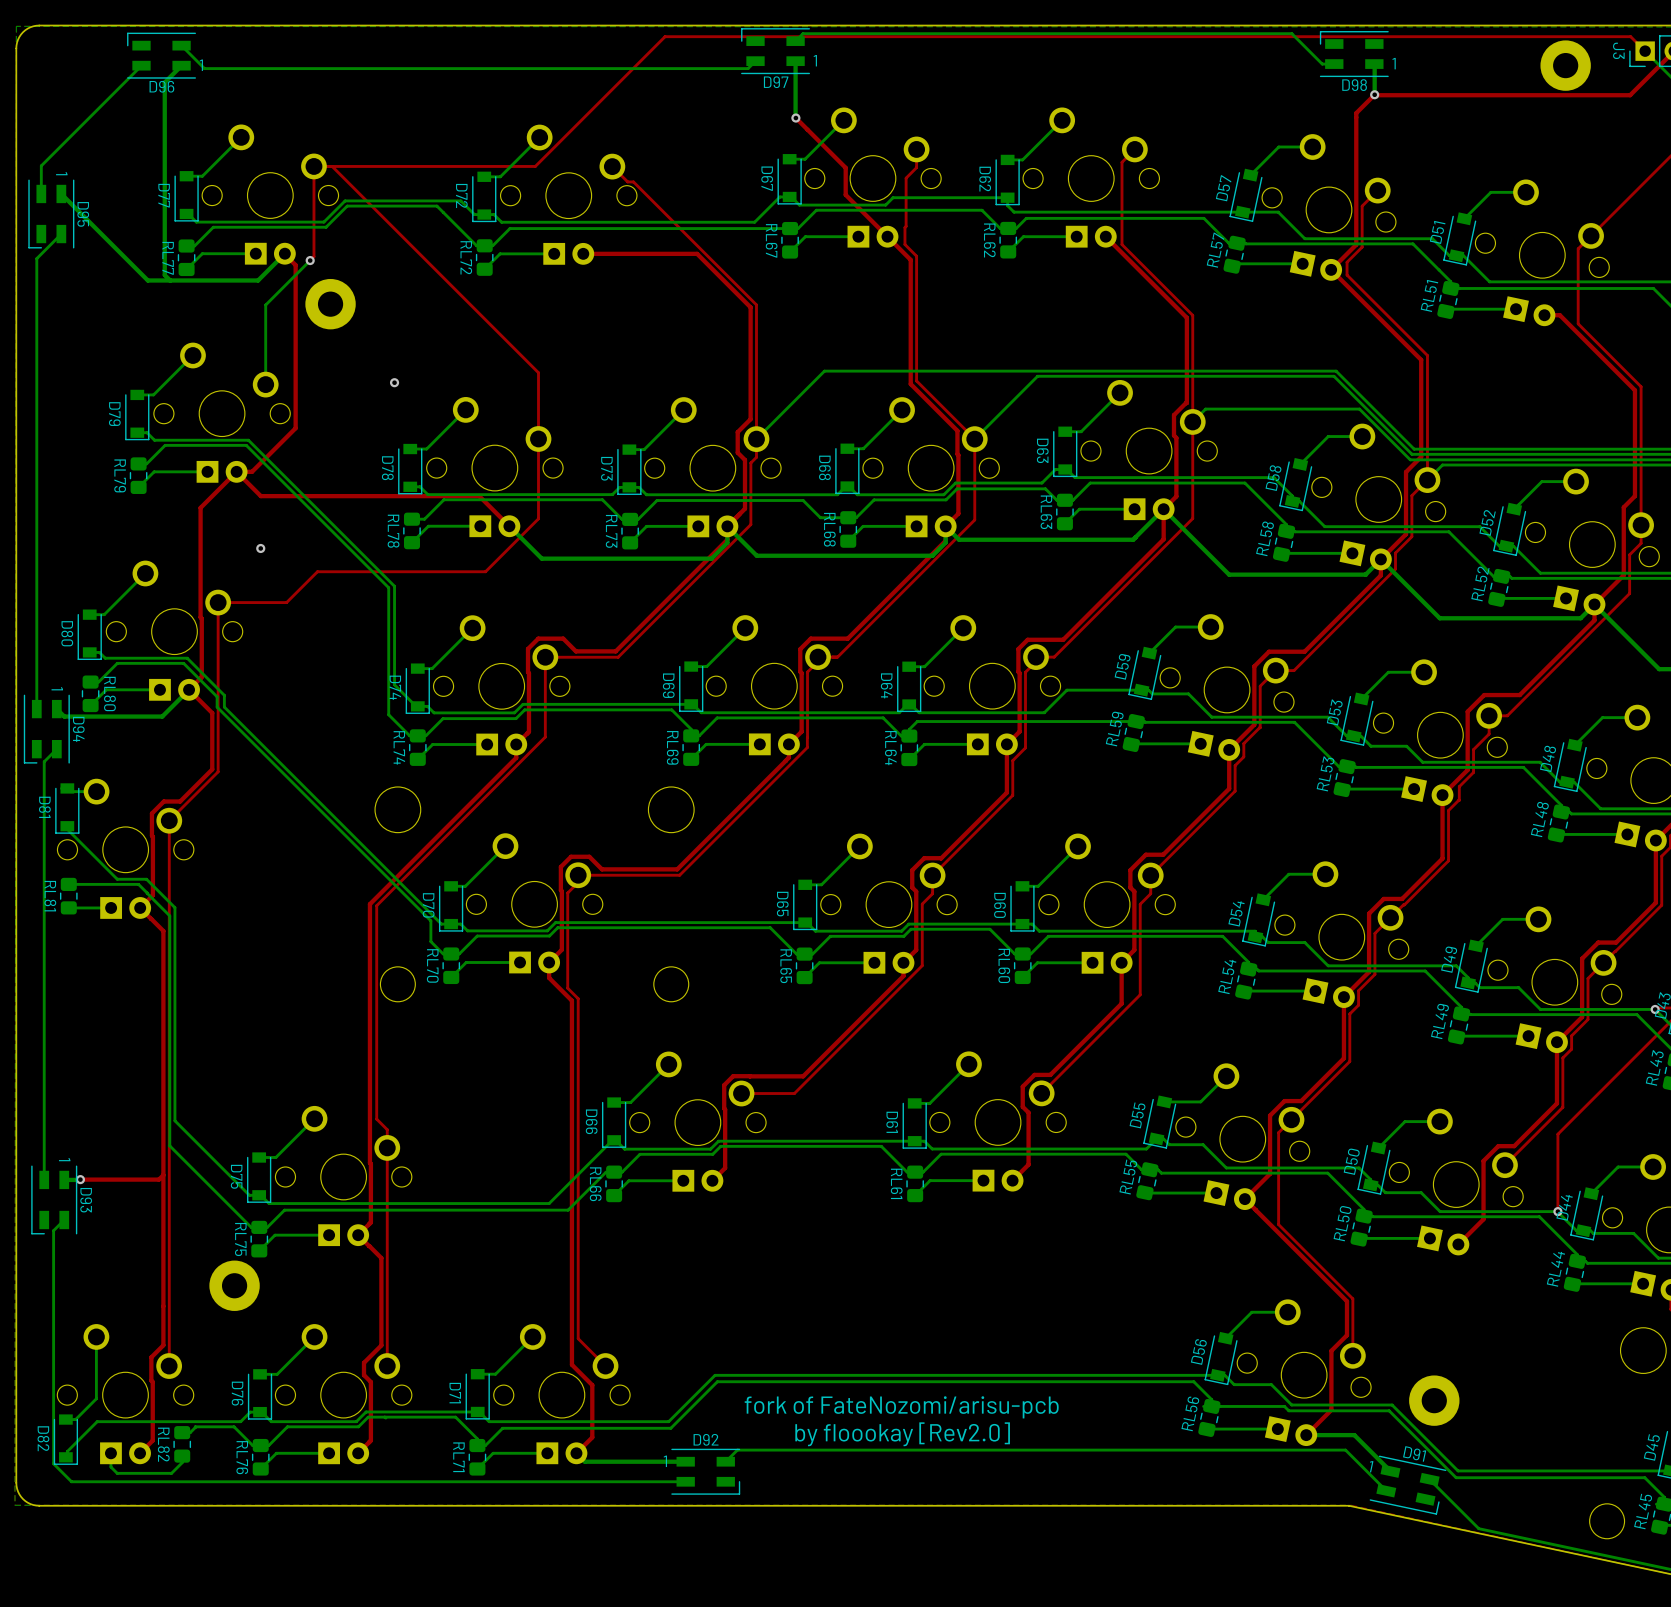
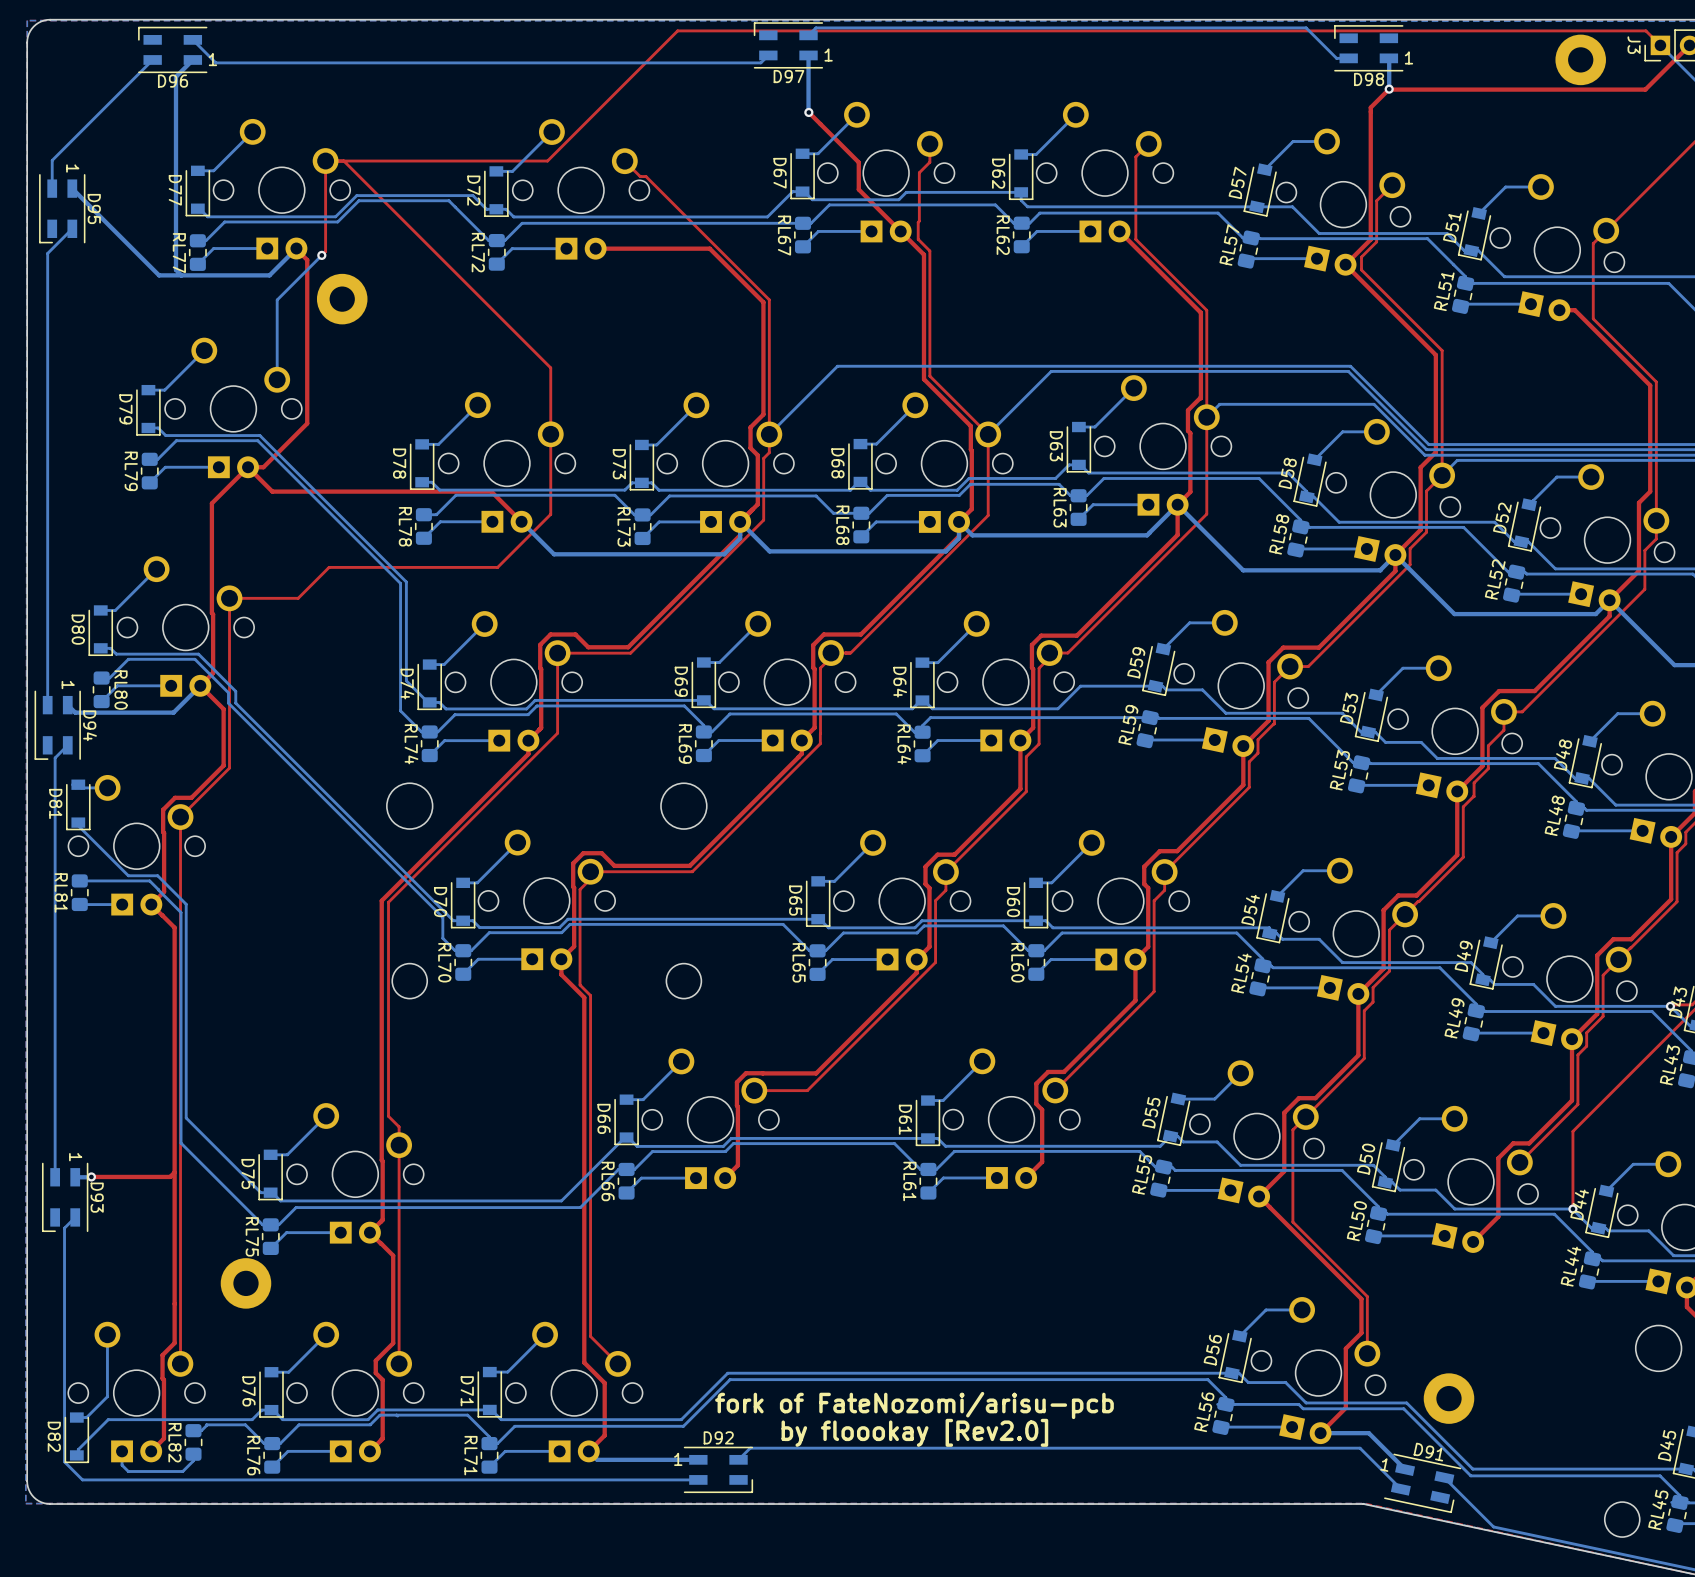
via: (394, 382) -> none
via: (260, 548) -> none

